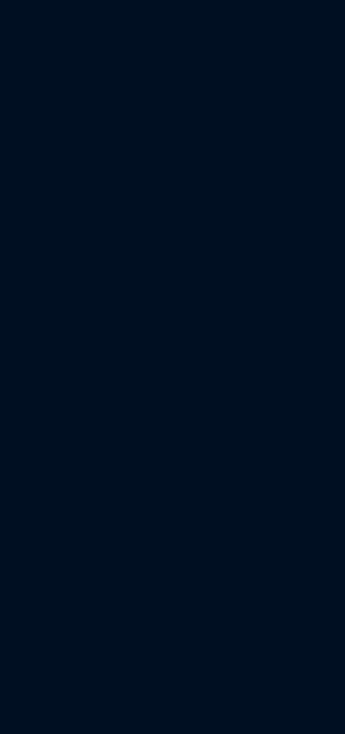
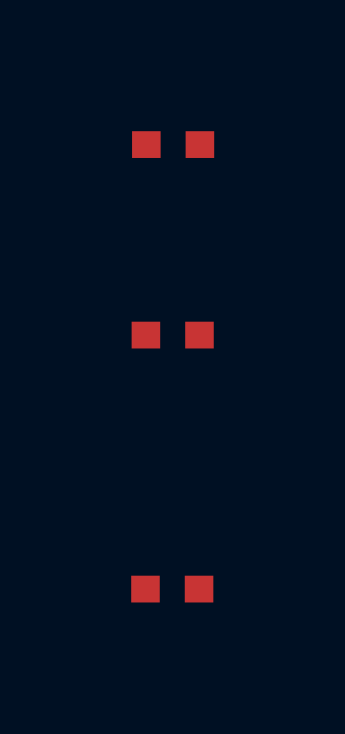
part: none -> (173, 144)
part: none -> (172, 335)
part: none -> (172, 589)

